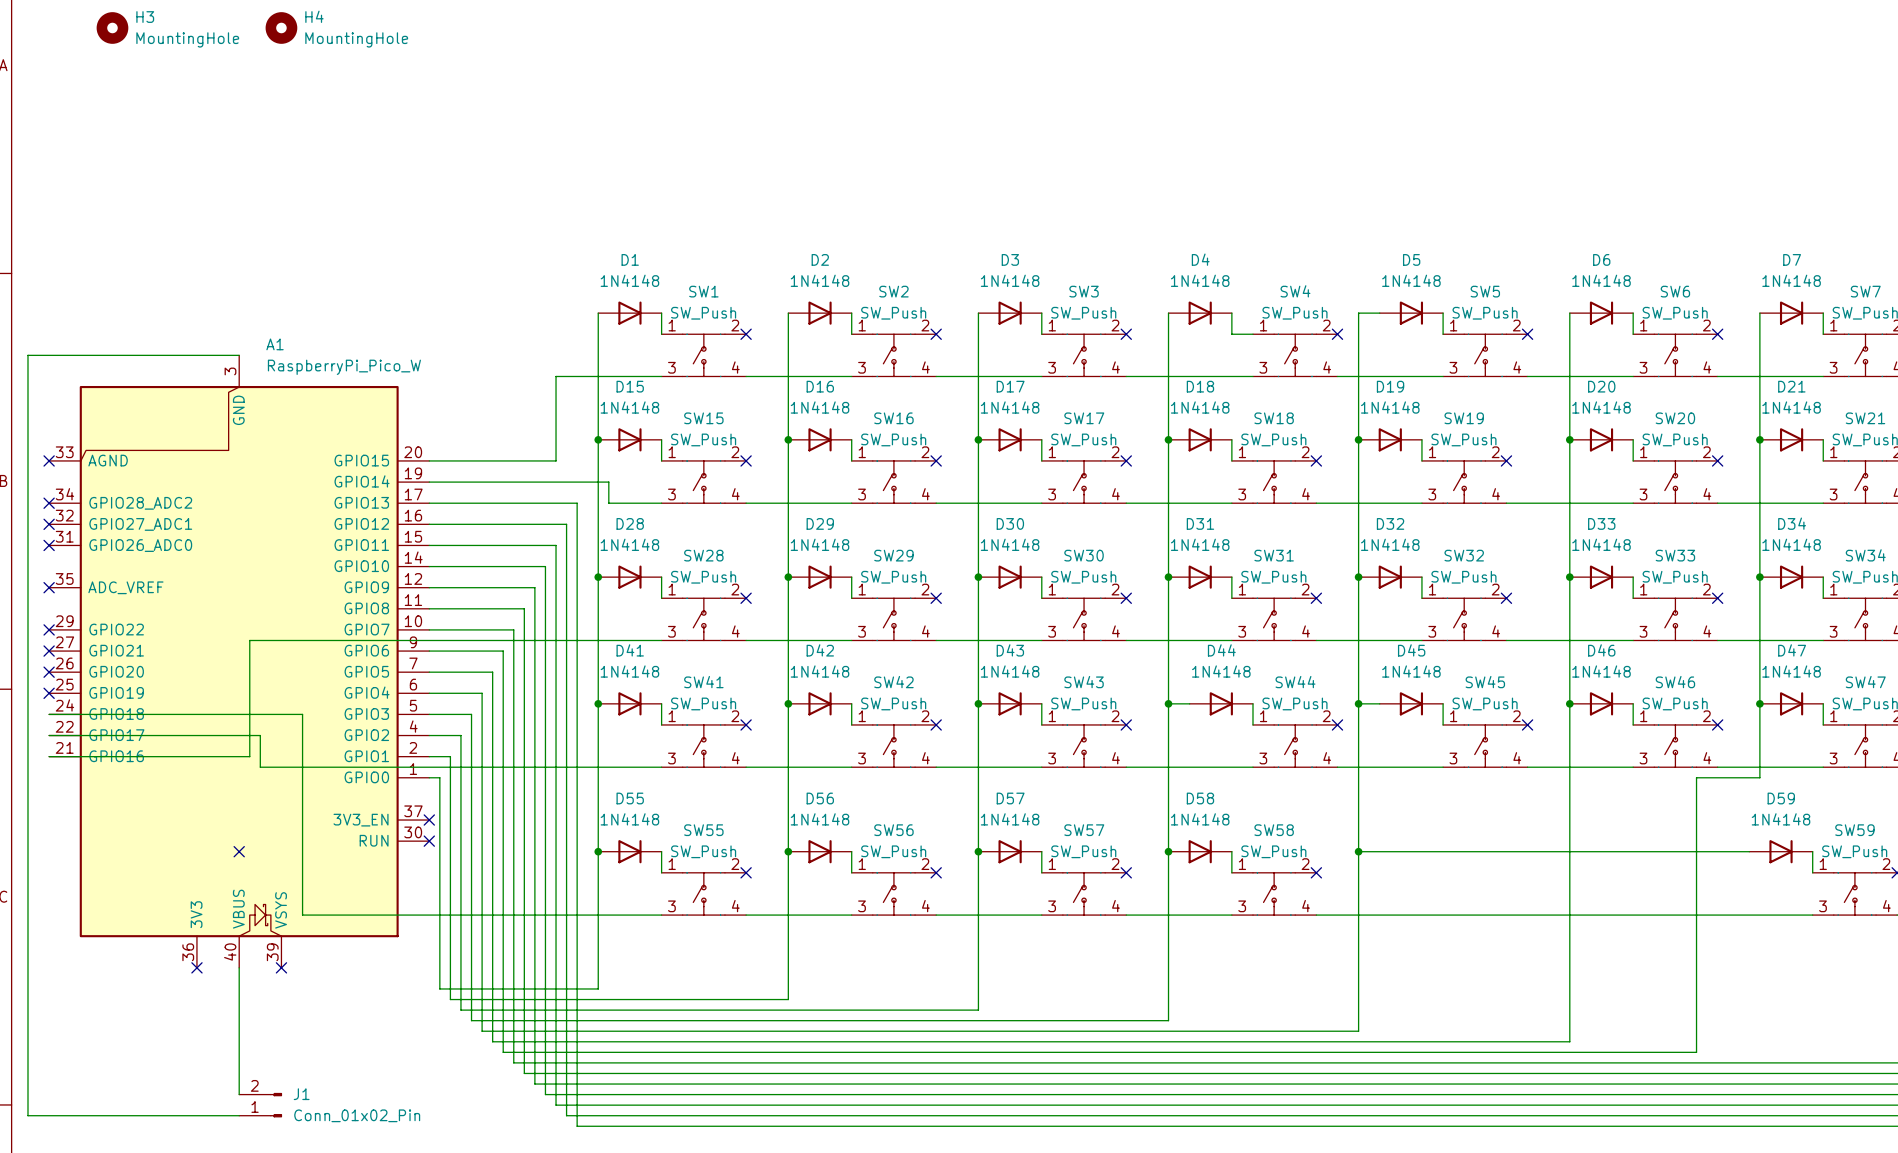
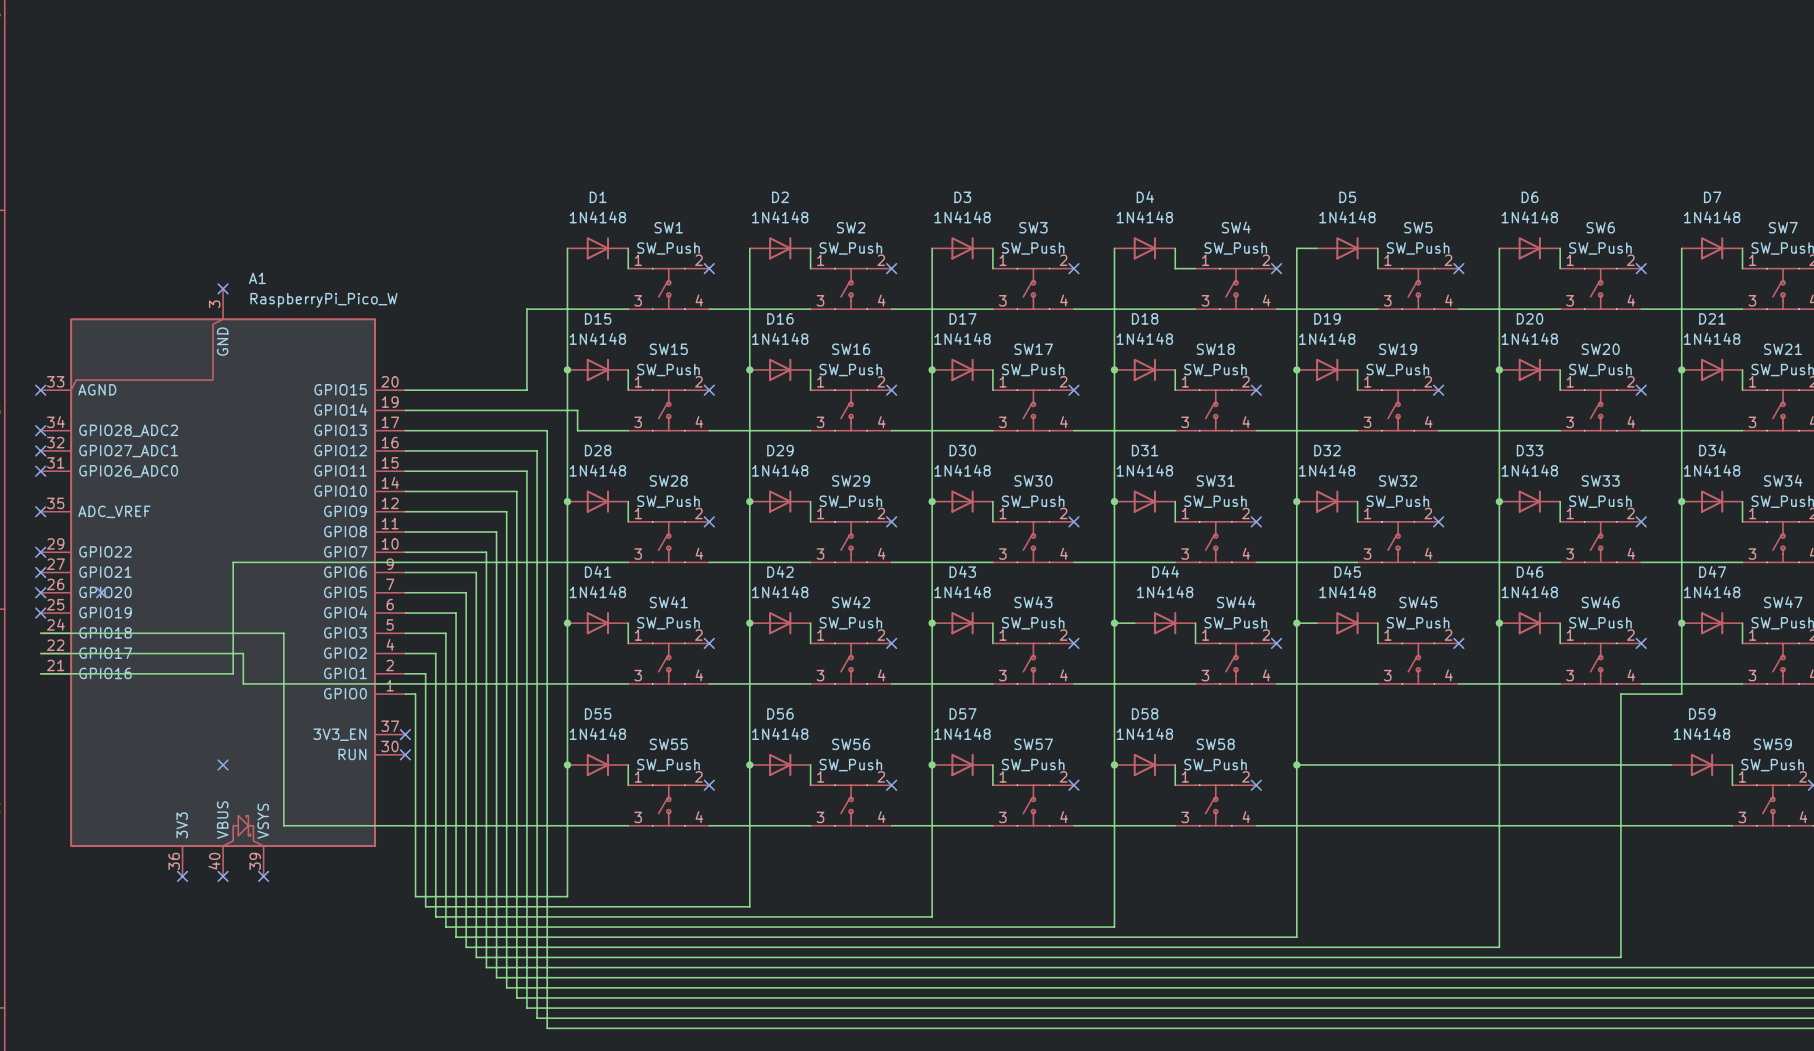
wire: (239, 355) (27, 355) (27, 1115) (239, 1115) -> none
no-connect mark: none -> (223, 288)
no-connect mark: none -> (101, 592)
wire: (239, 967) (239, 1094) -> none
no-connect mark: none -> (223, 876)
J1: Conn_01x02_Pin (260, 1105) -> none

